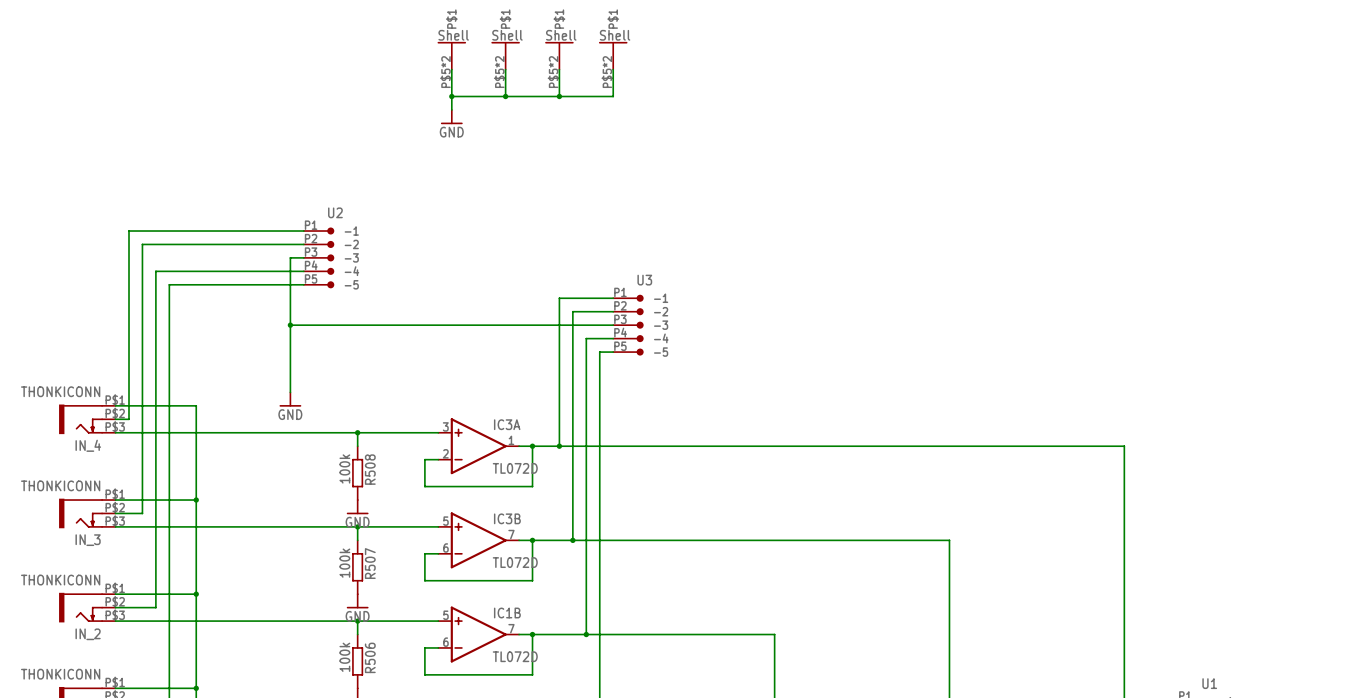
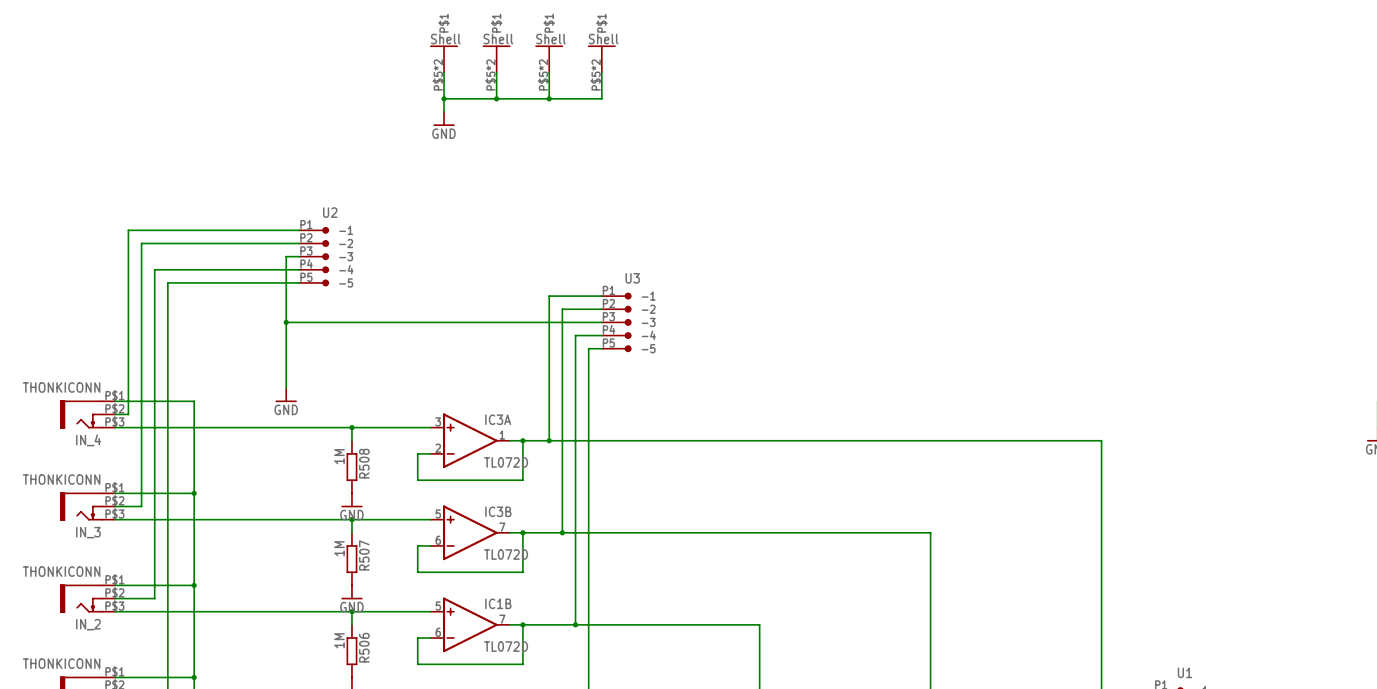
R508 value: 100k (344, 468) -> 1M (339, 456)
R507 value: 100k (344, 563) -> 1M (339, 548)
R506 value: 100k (344, 657) -> 1M (339, 640)

